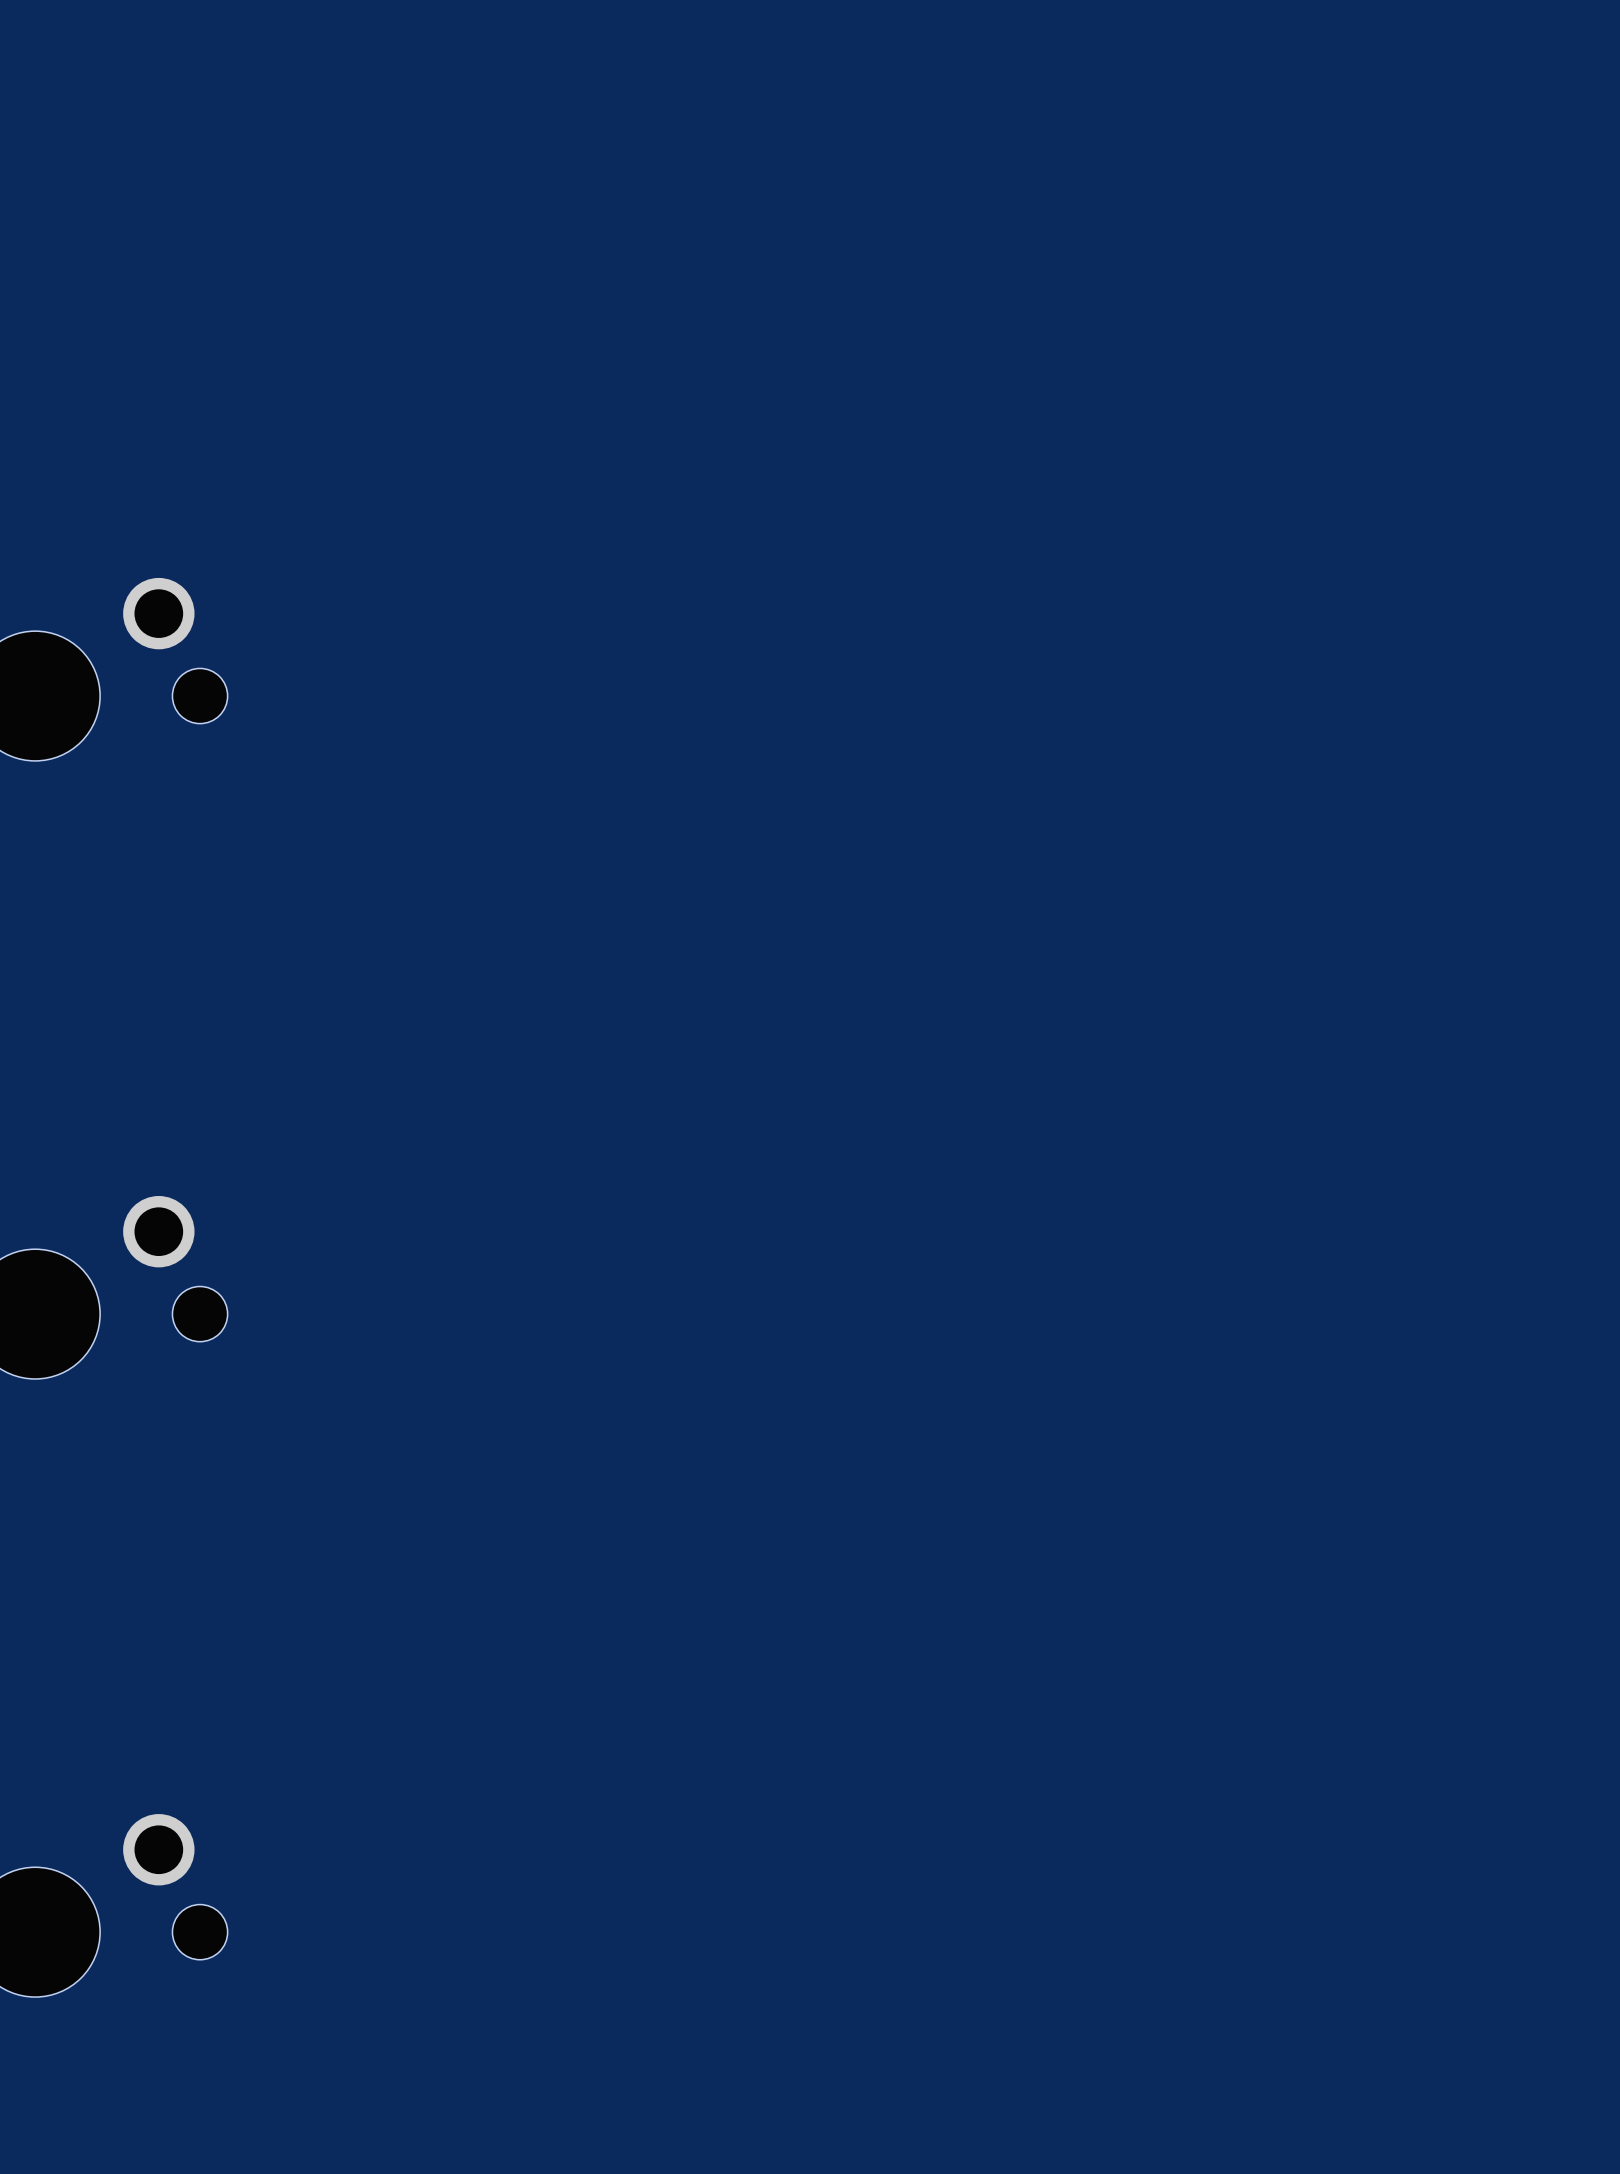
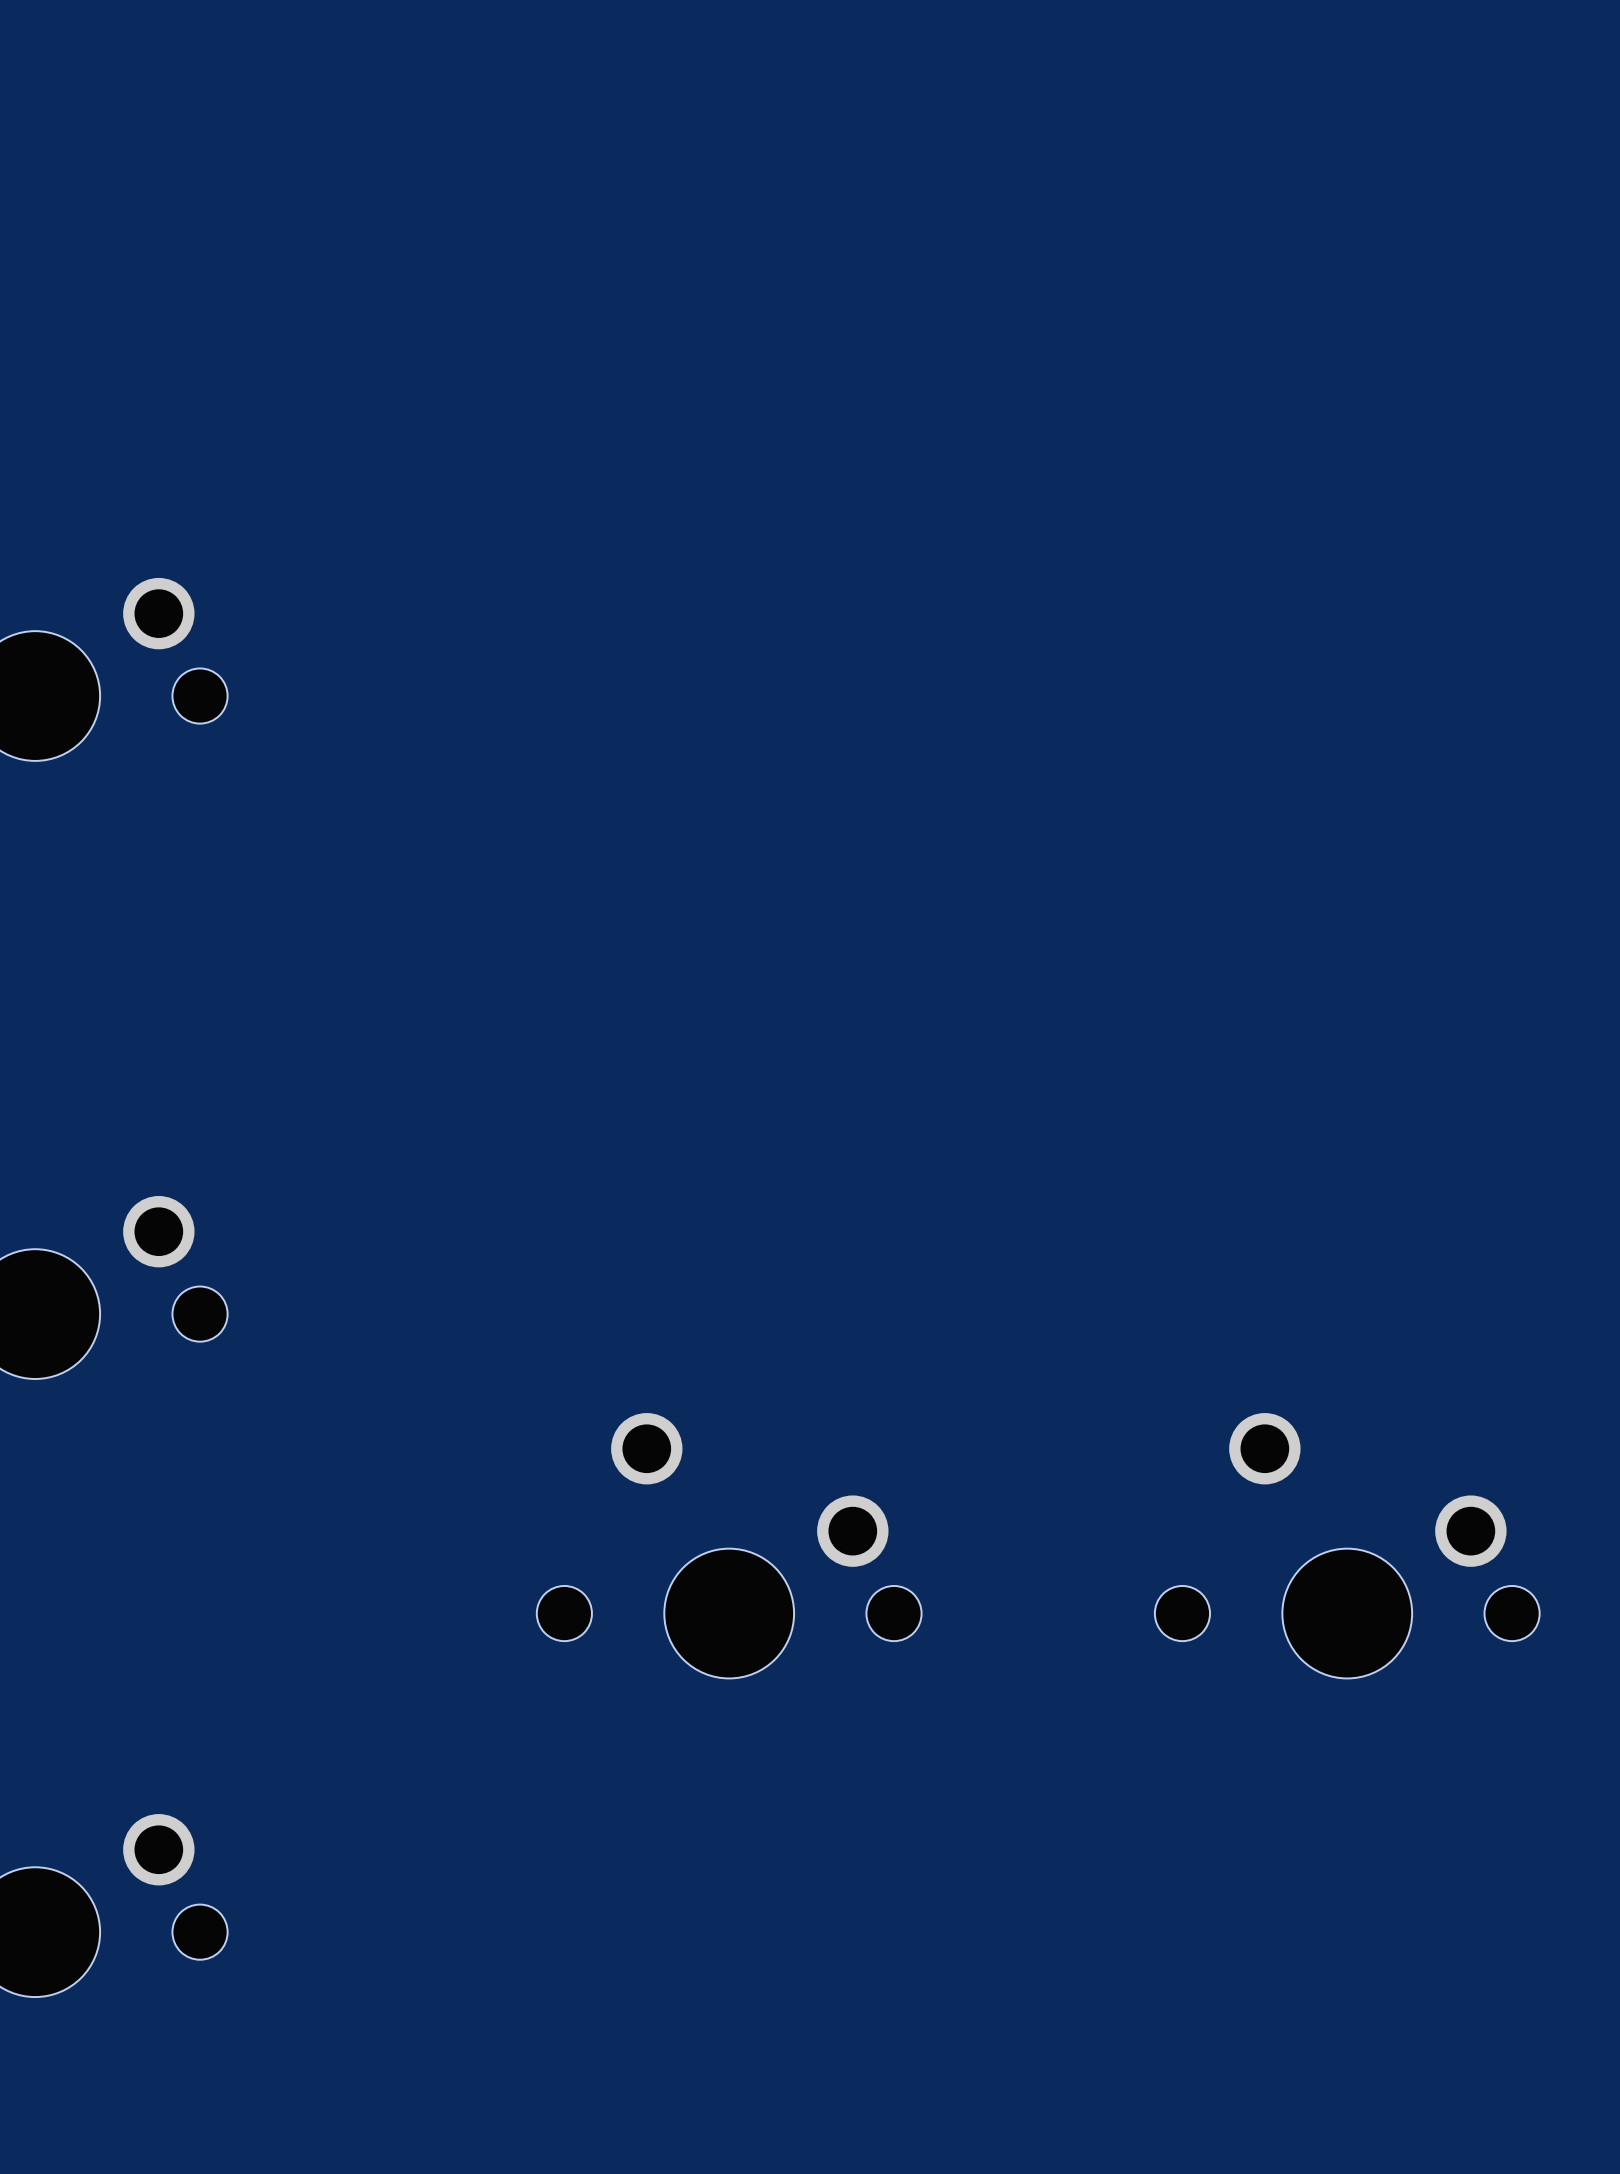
part: none -> (729, 1545)
part: none -> (1347, 1545)

